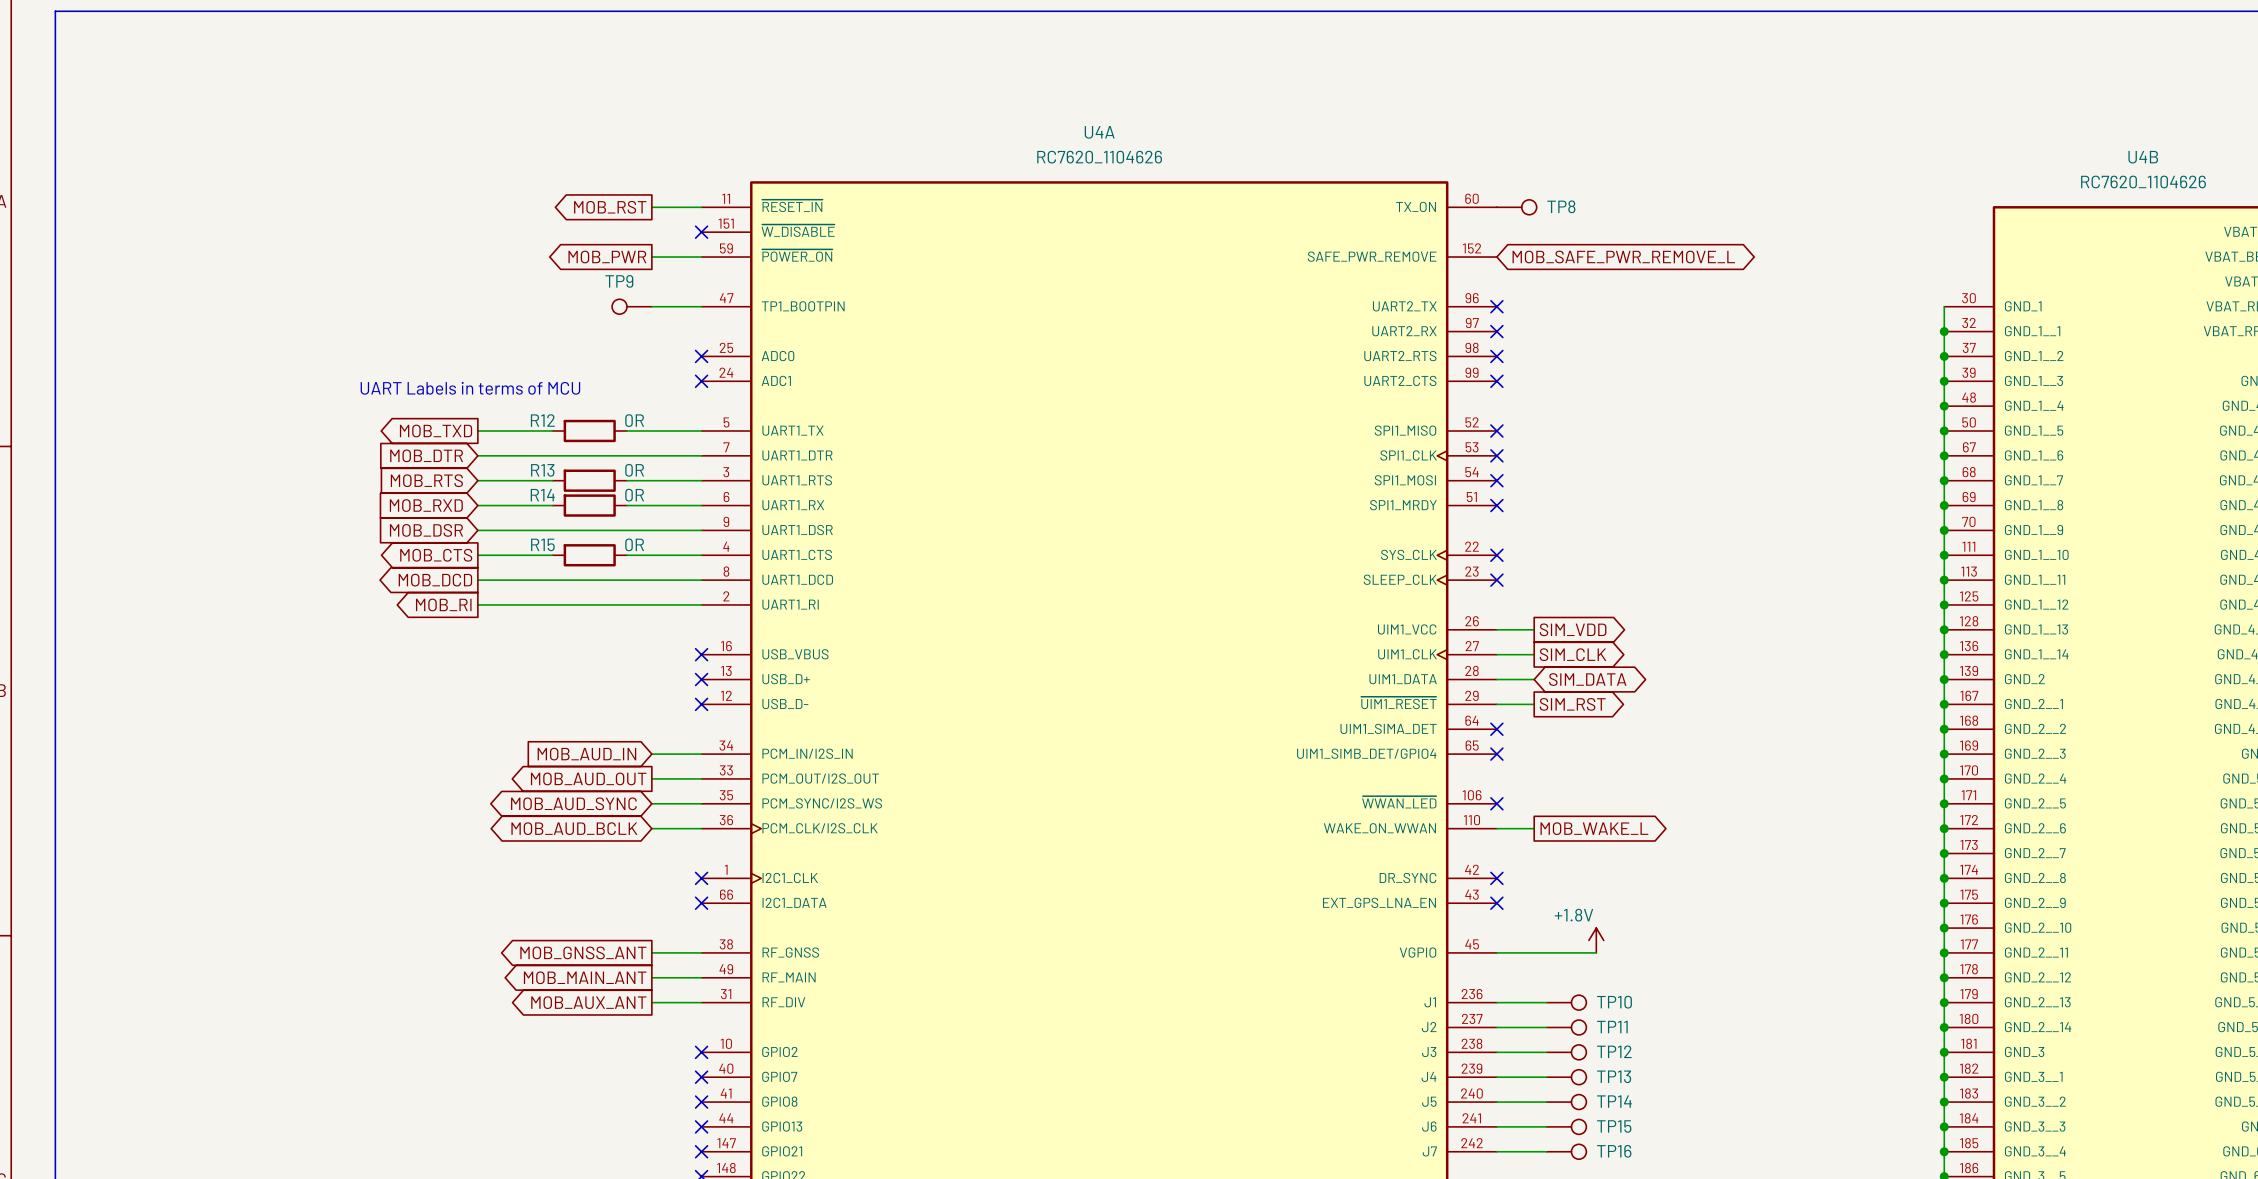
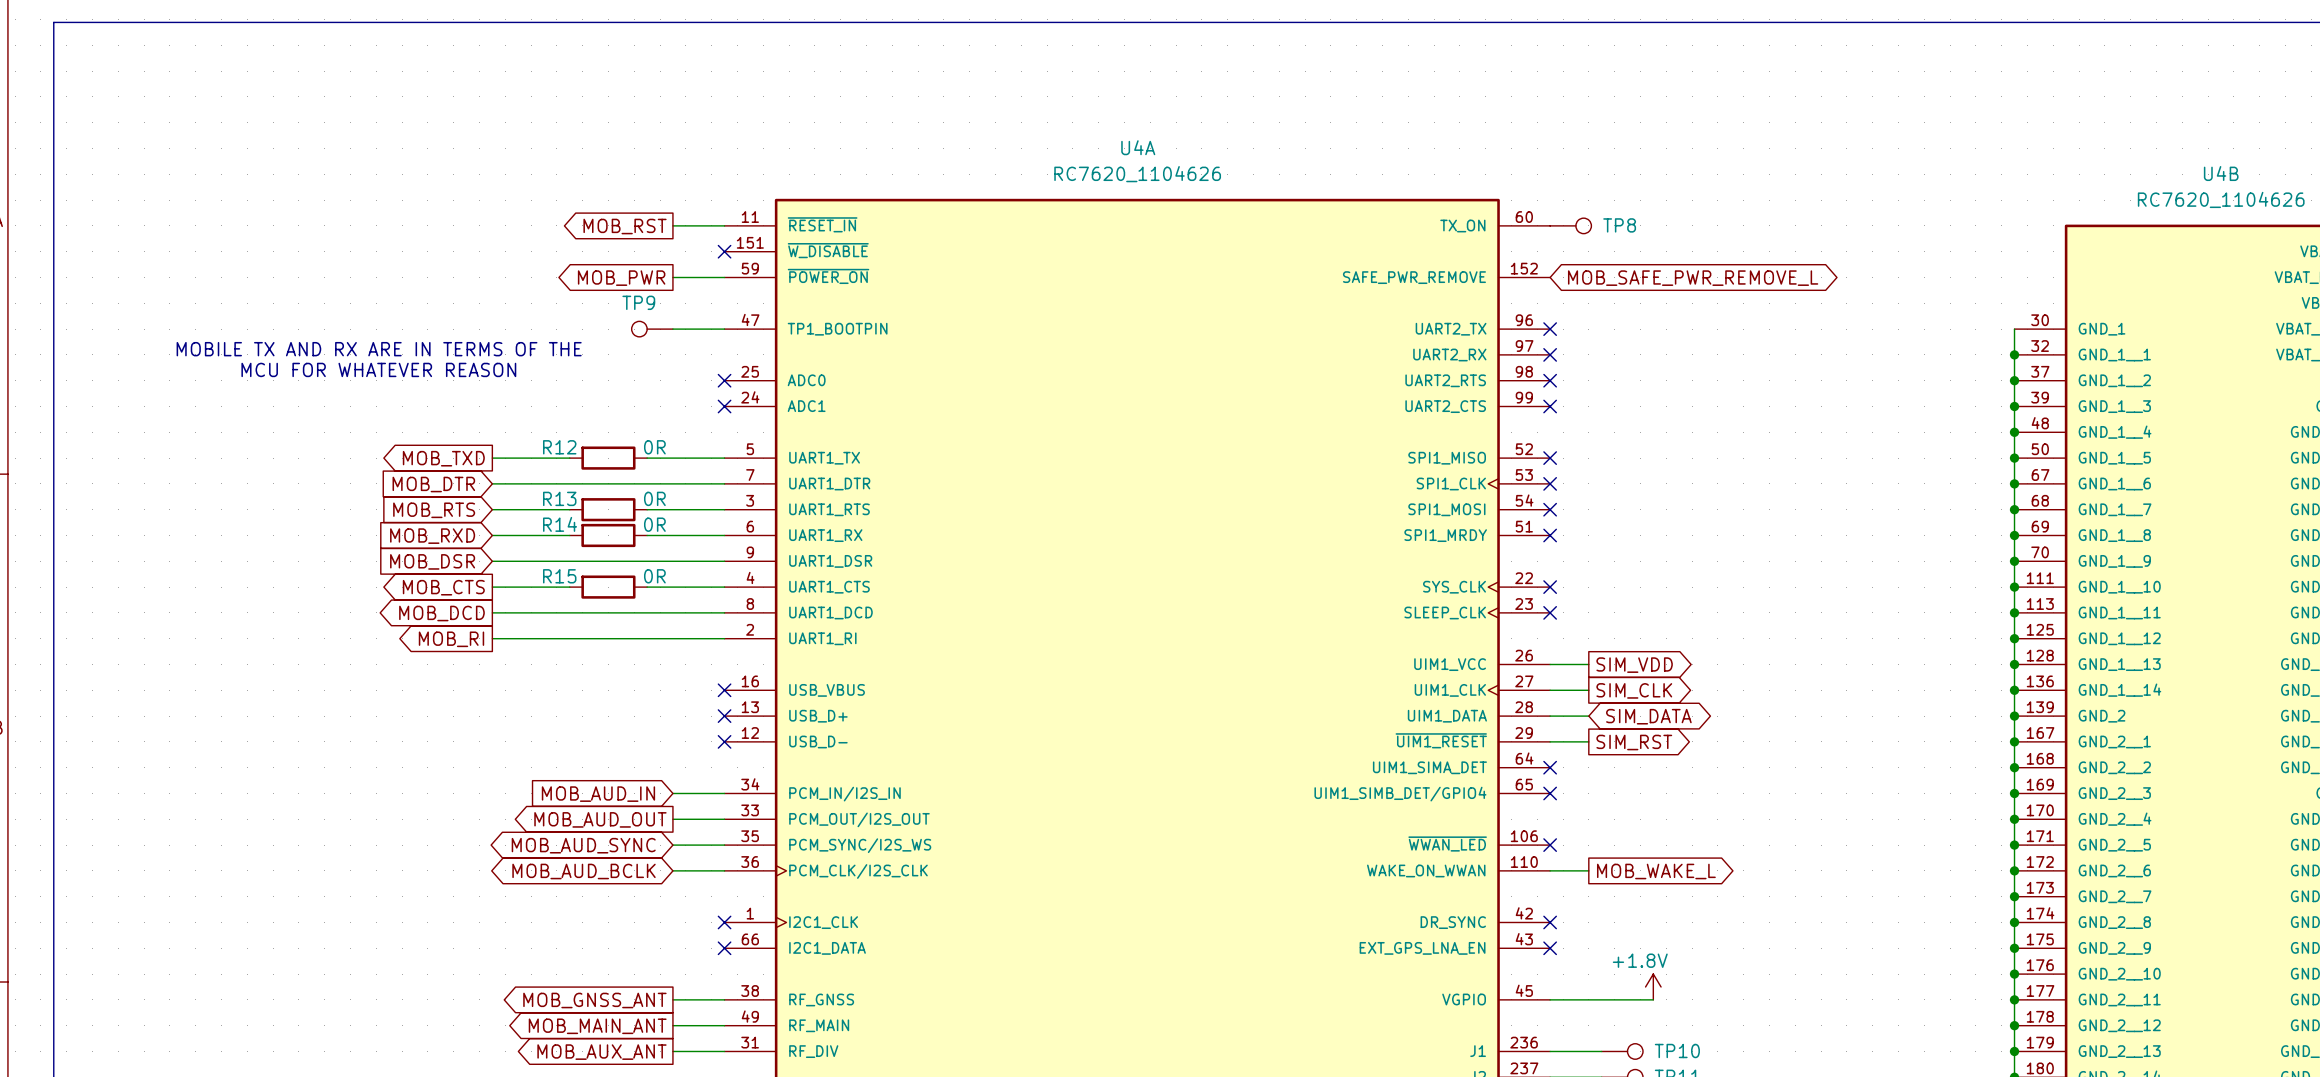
text: none -> MOBILE TX AND RX ARE IN TERMS OF THE (379, 349)
text: none -> MCU FOR WHATEVER REASON (378, 369)
text: UART Labels in terms of MCU (470, 388) -> none

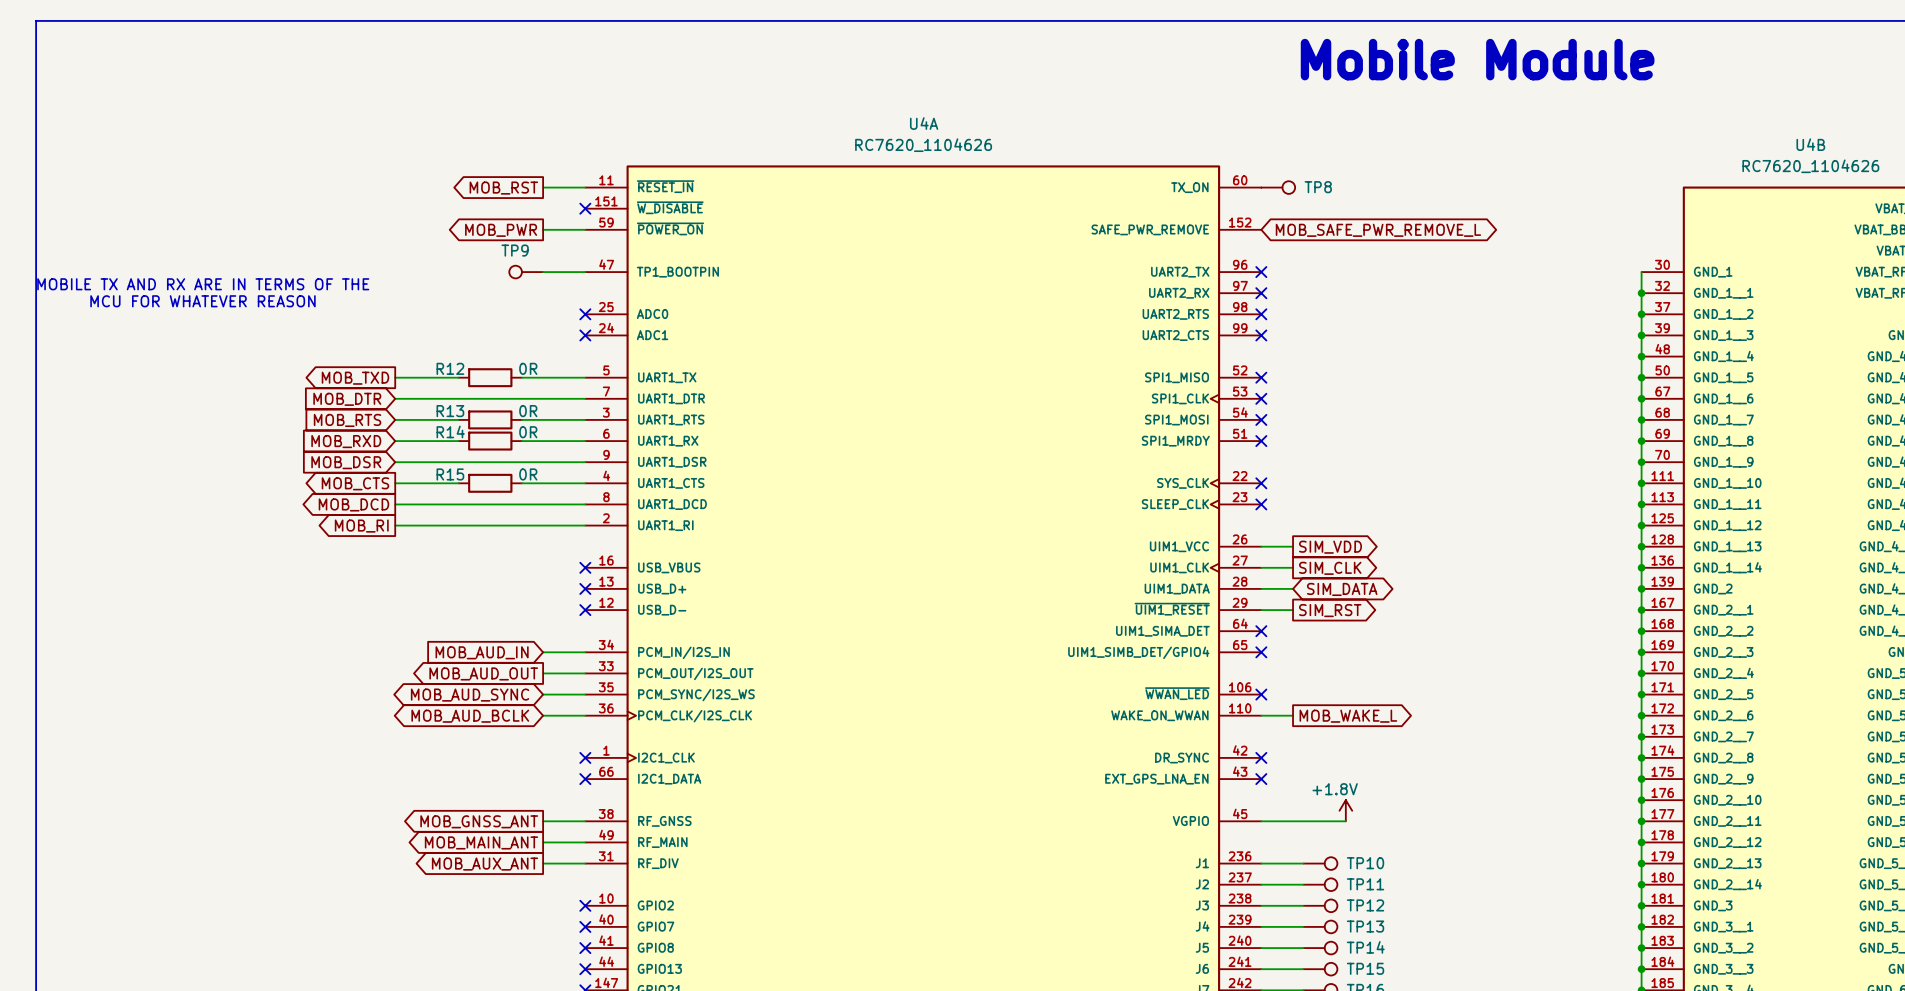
text: none -> Mobile Module (1477, 59)
text position: MOBILE TX AND RX ARE IN TERMS OF THE (379, 349) -> MOBILE TX AND RX ARE IN TERMS OF THE (203, 284)
text position: MCU FOR WHATEVER REASON (378, 369) -> MCU FOR WHATEVER REASON (202, 301)

